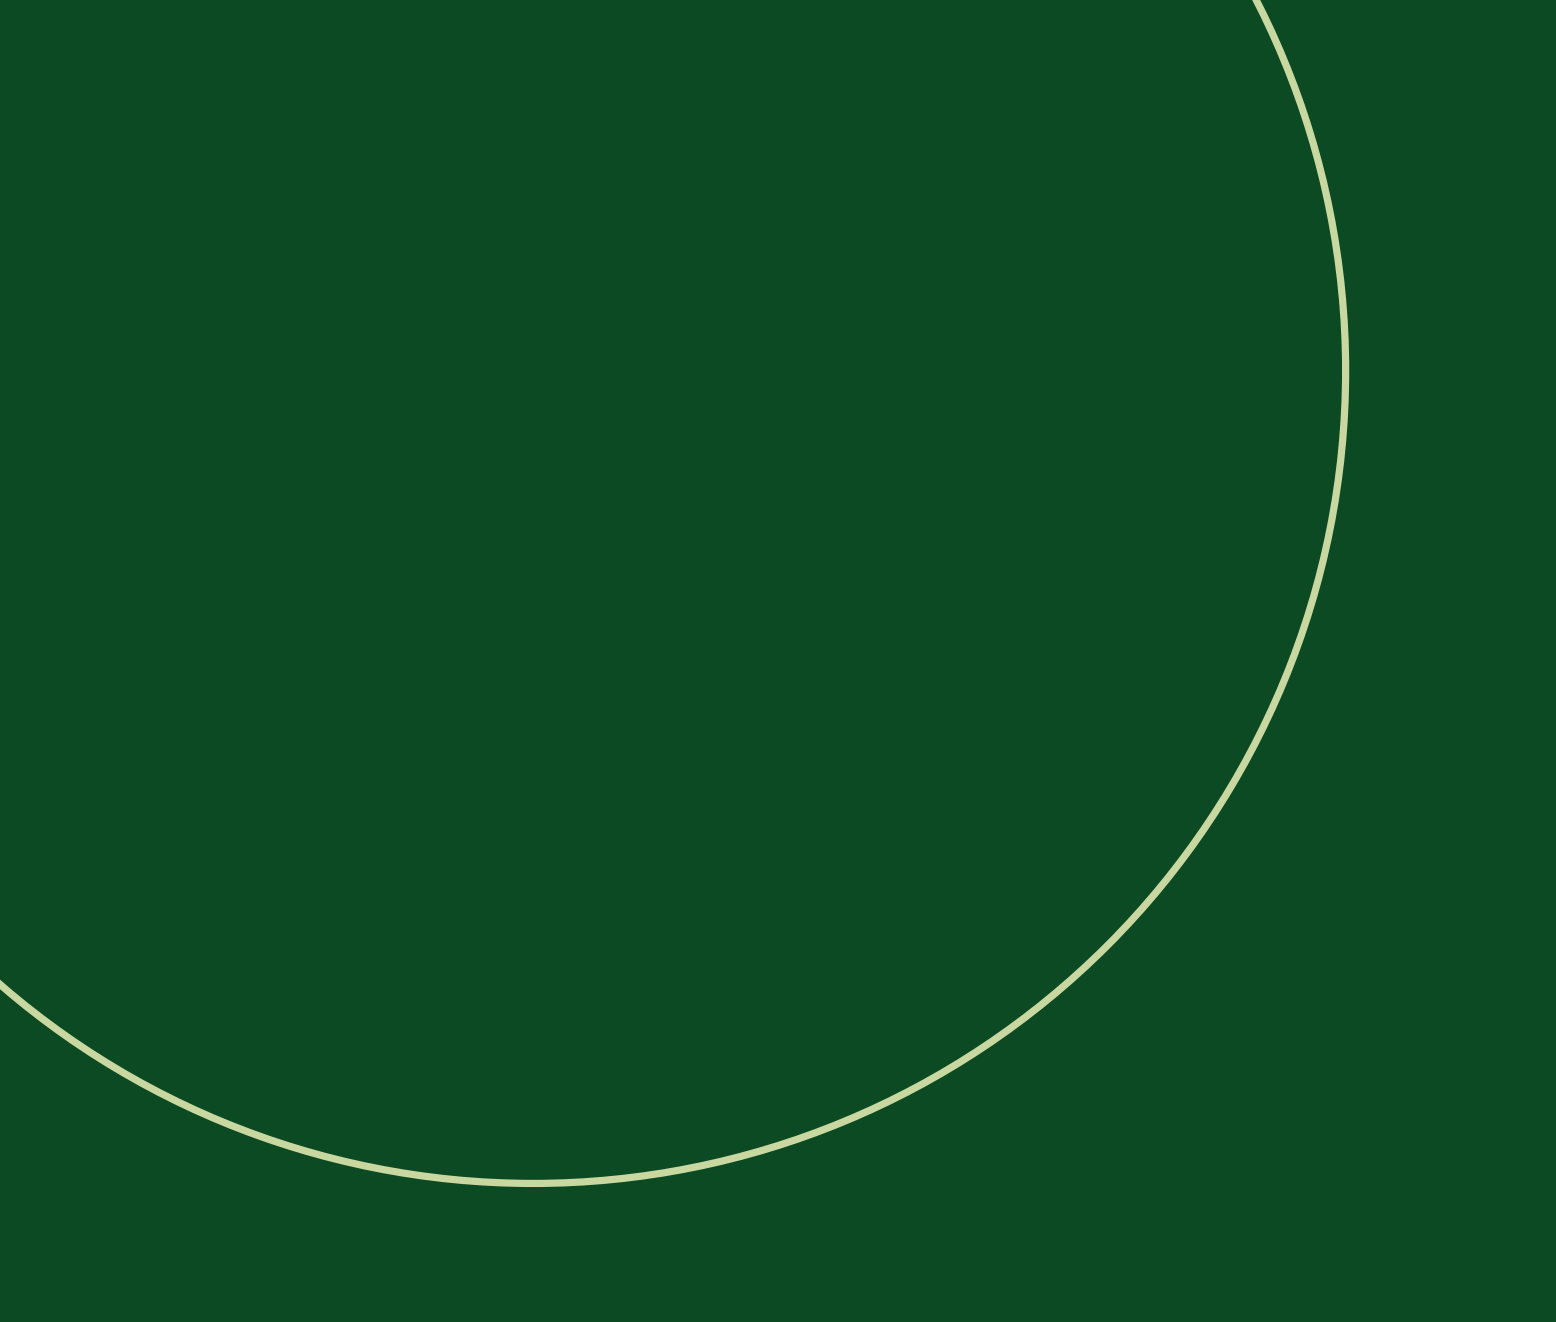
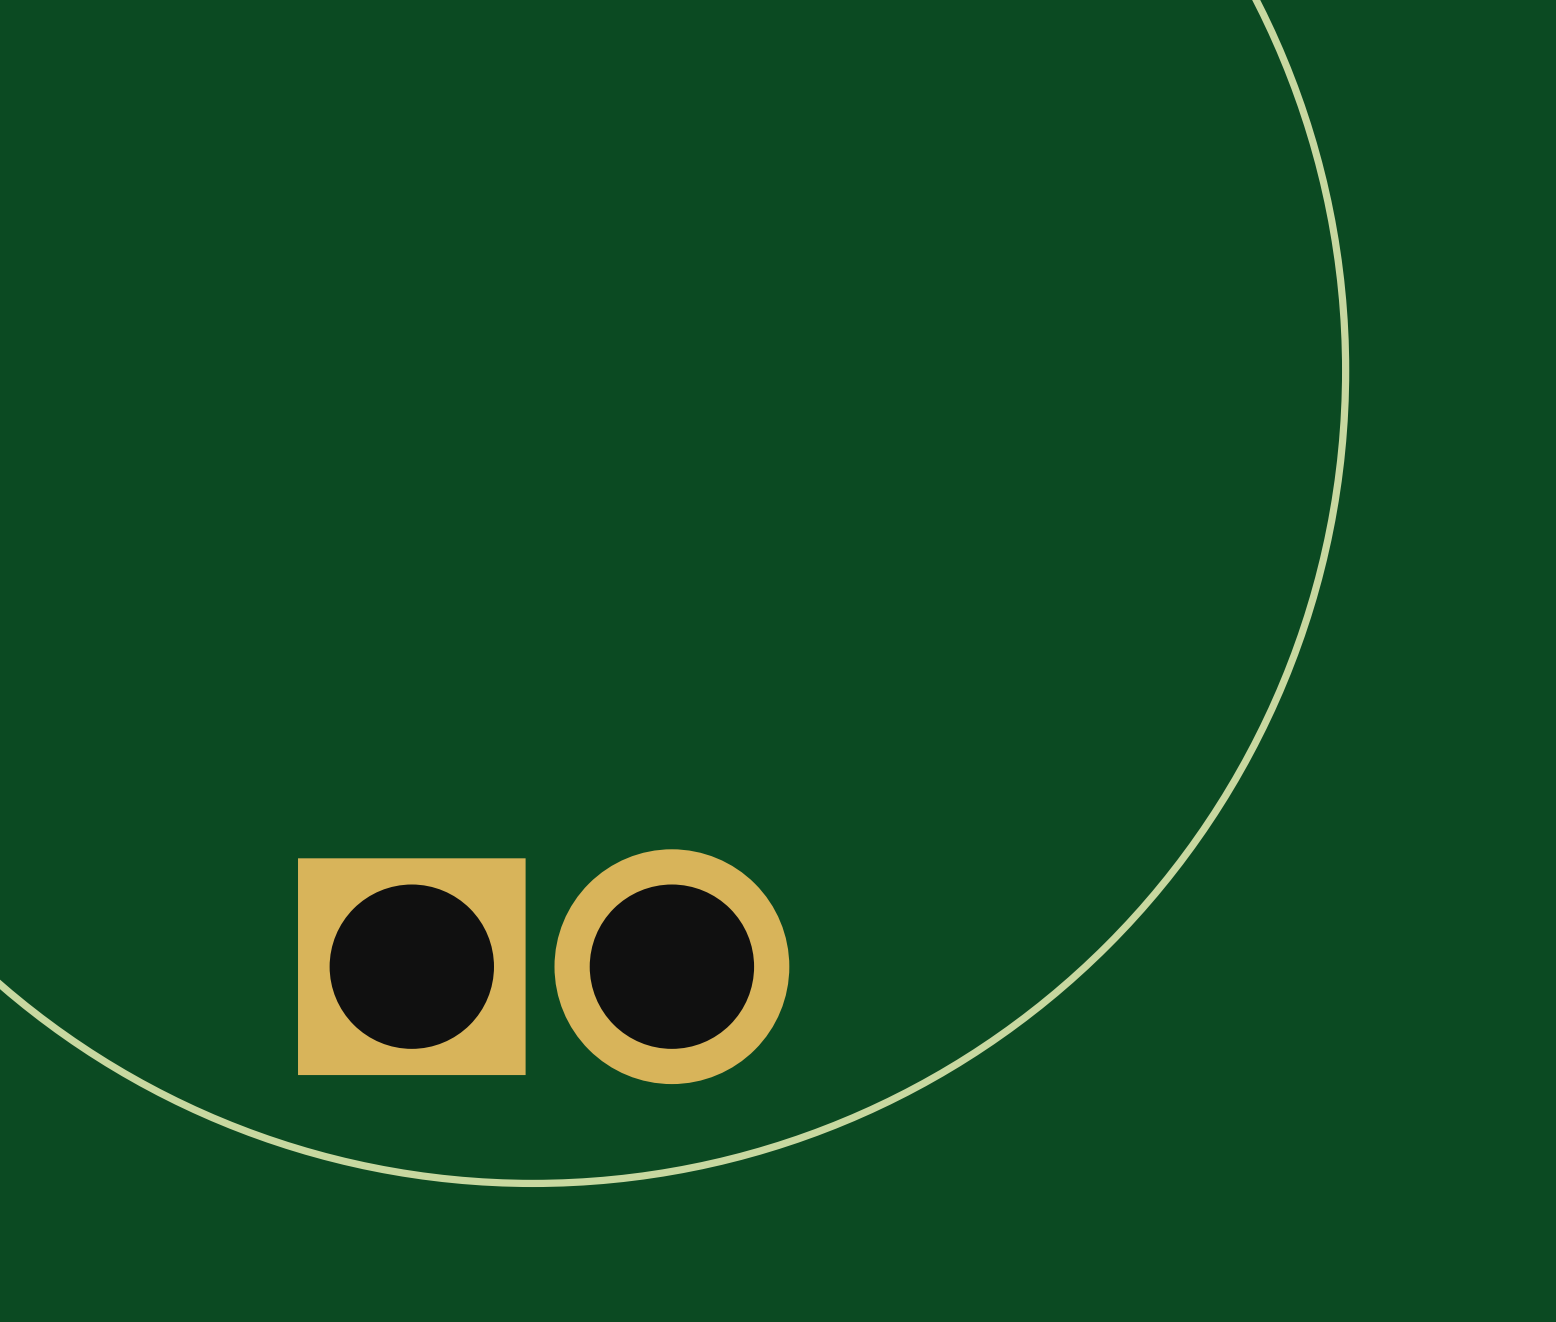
part: none -> (543, 966)

